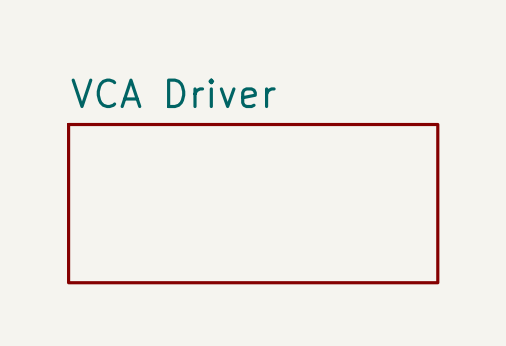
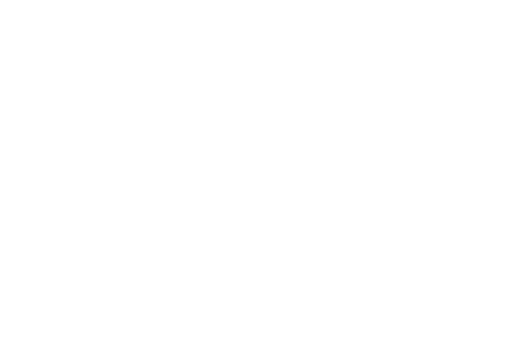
sheet VCA Driver: (253, 203) -> none

